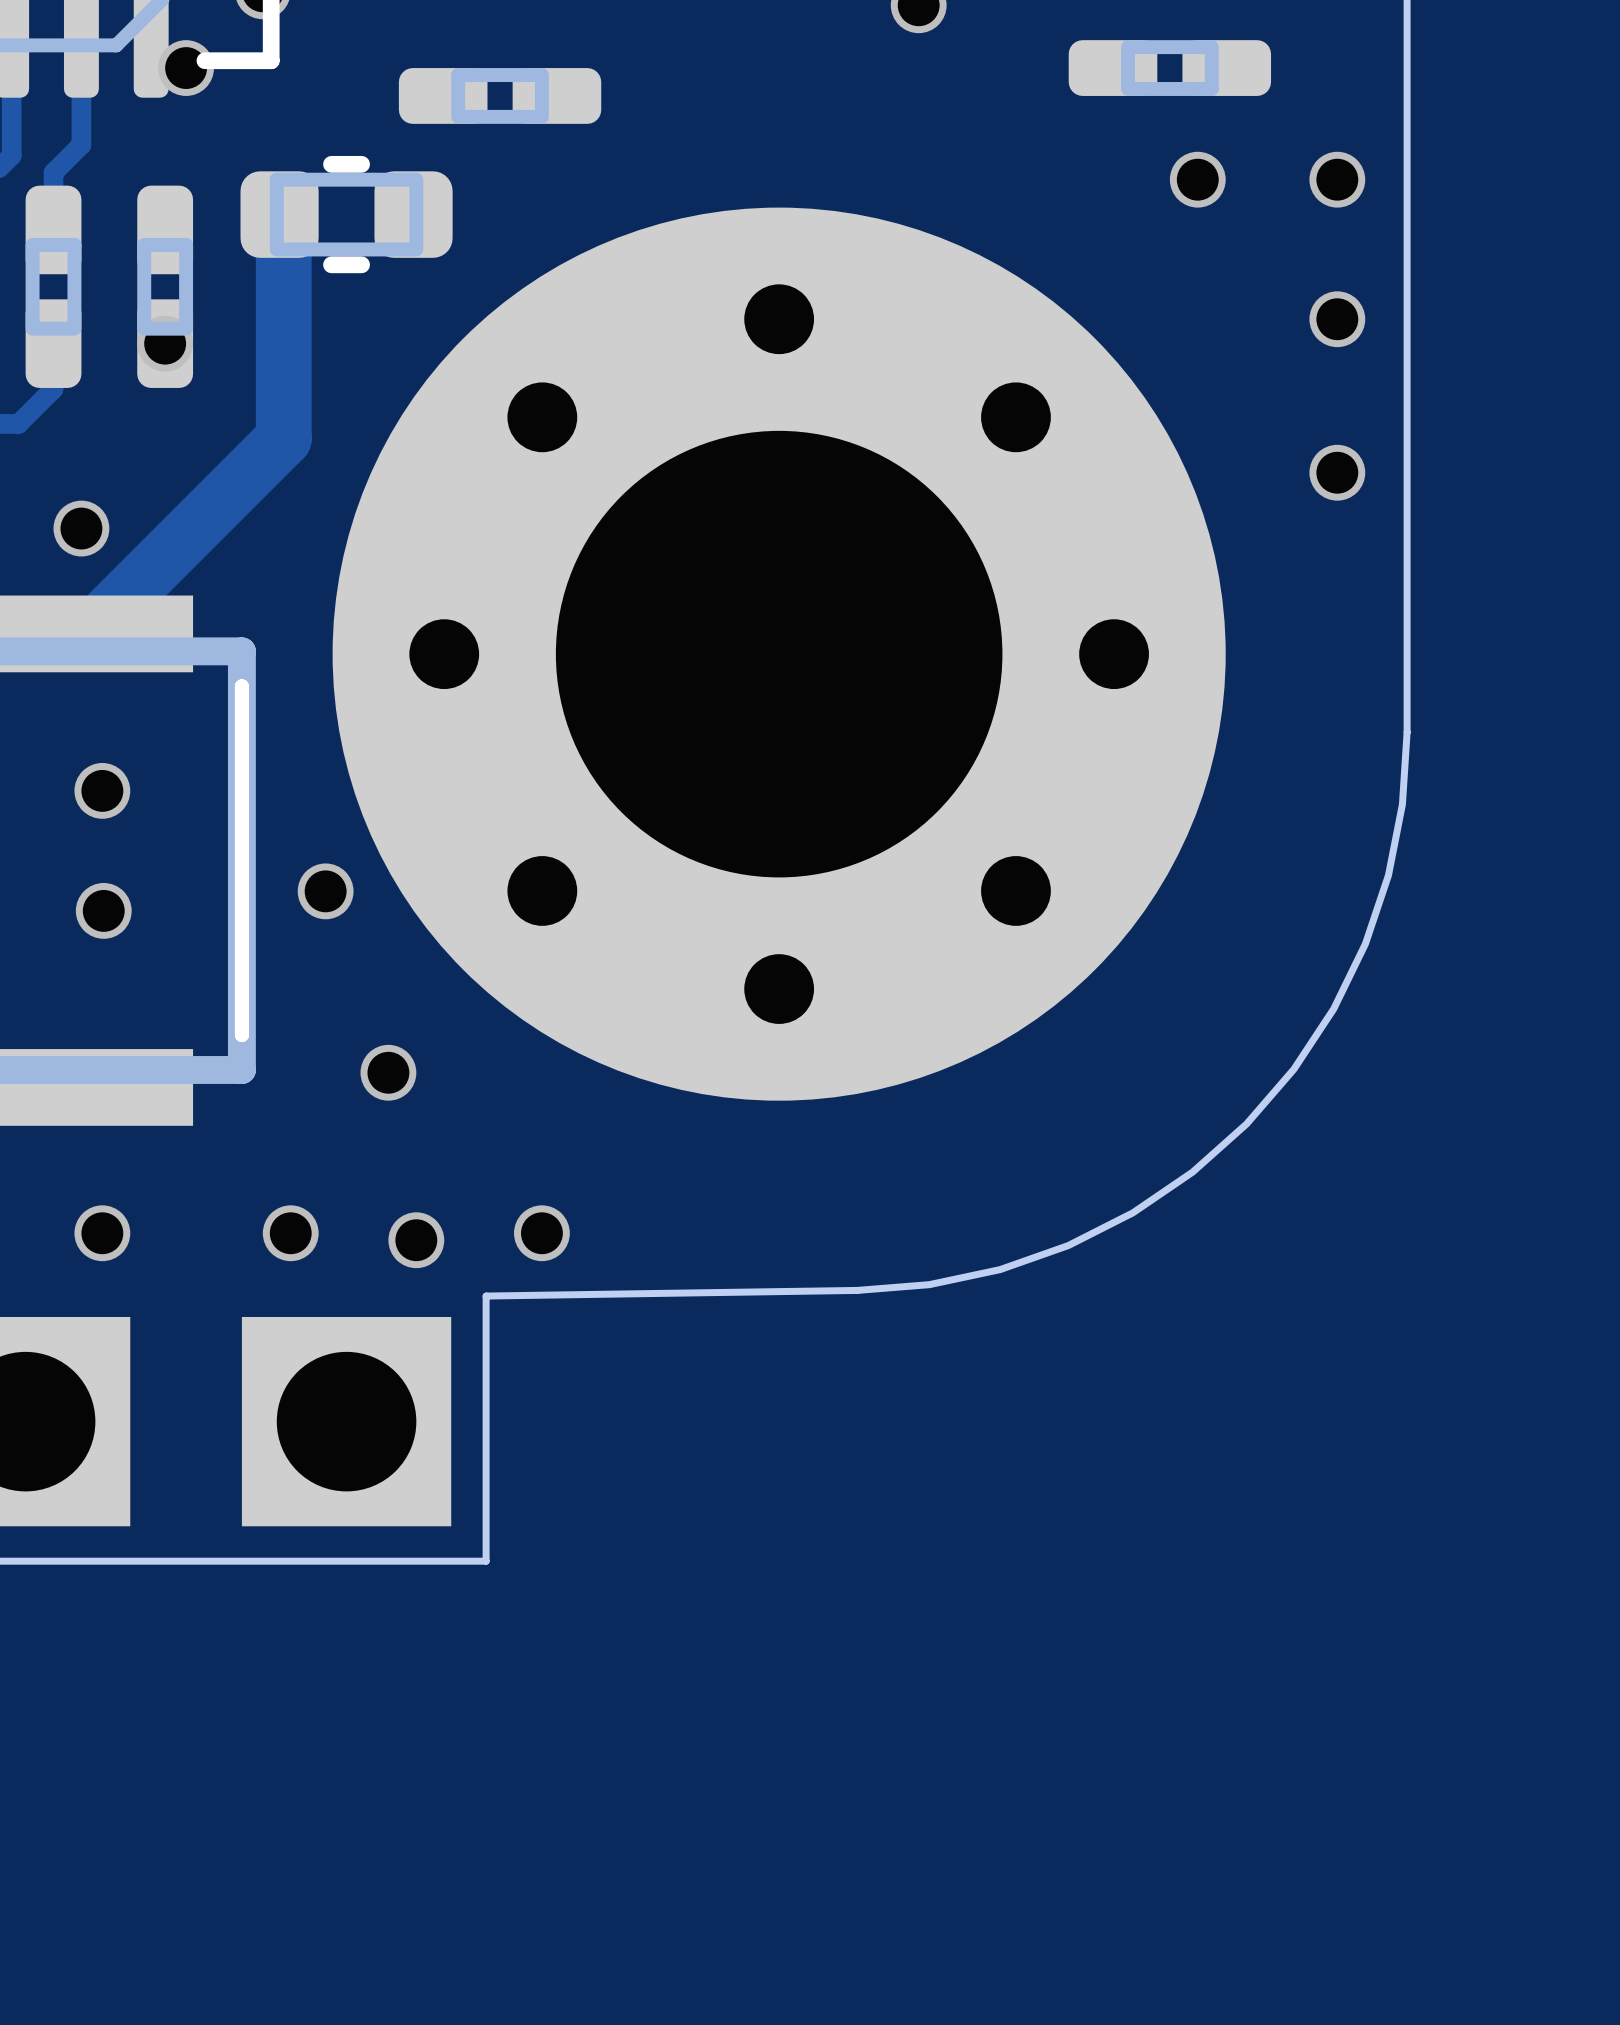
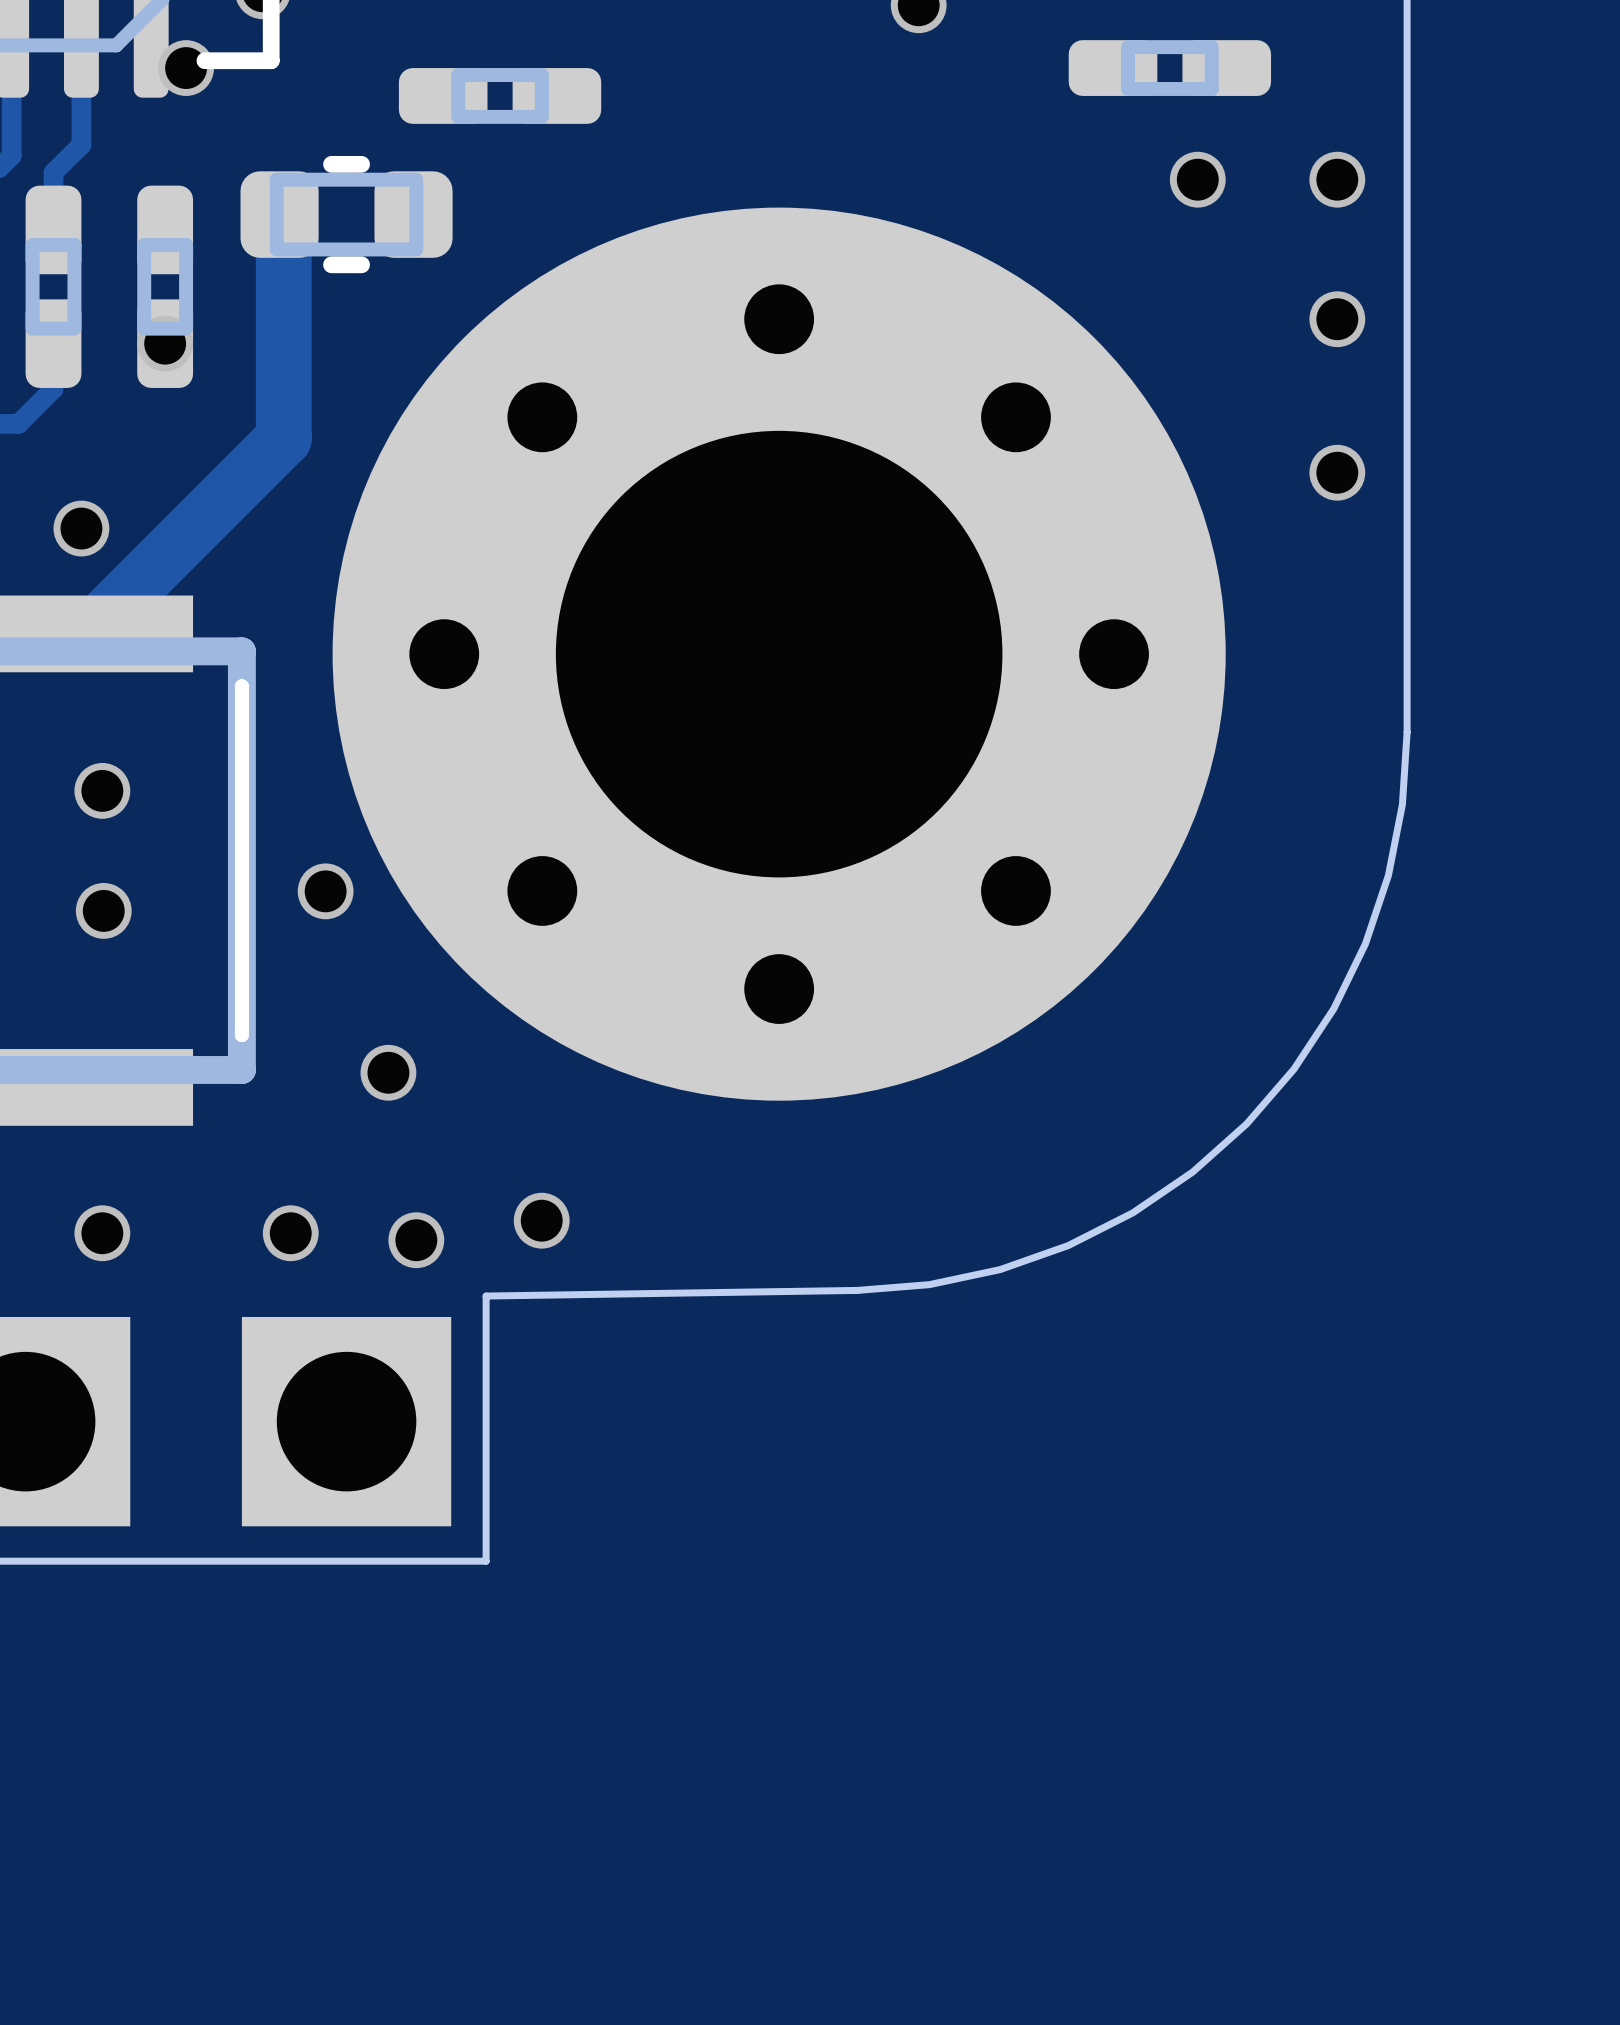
via position: (541, 1233) -> (541, 1220)

